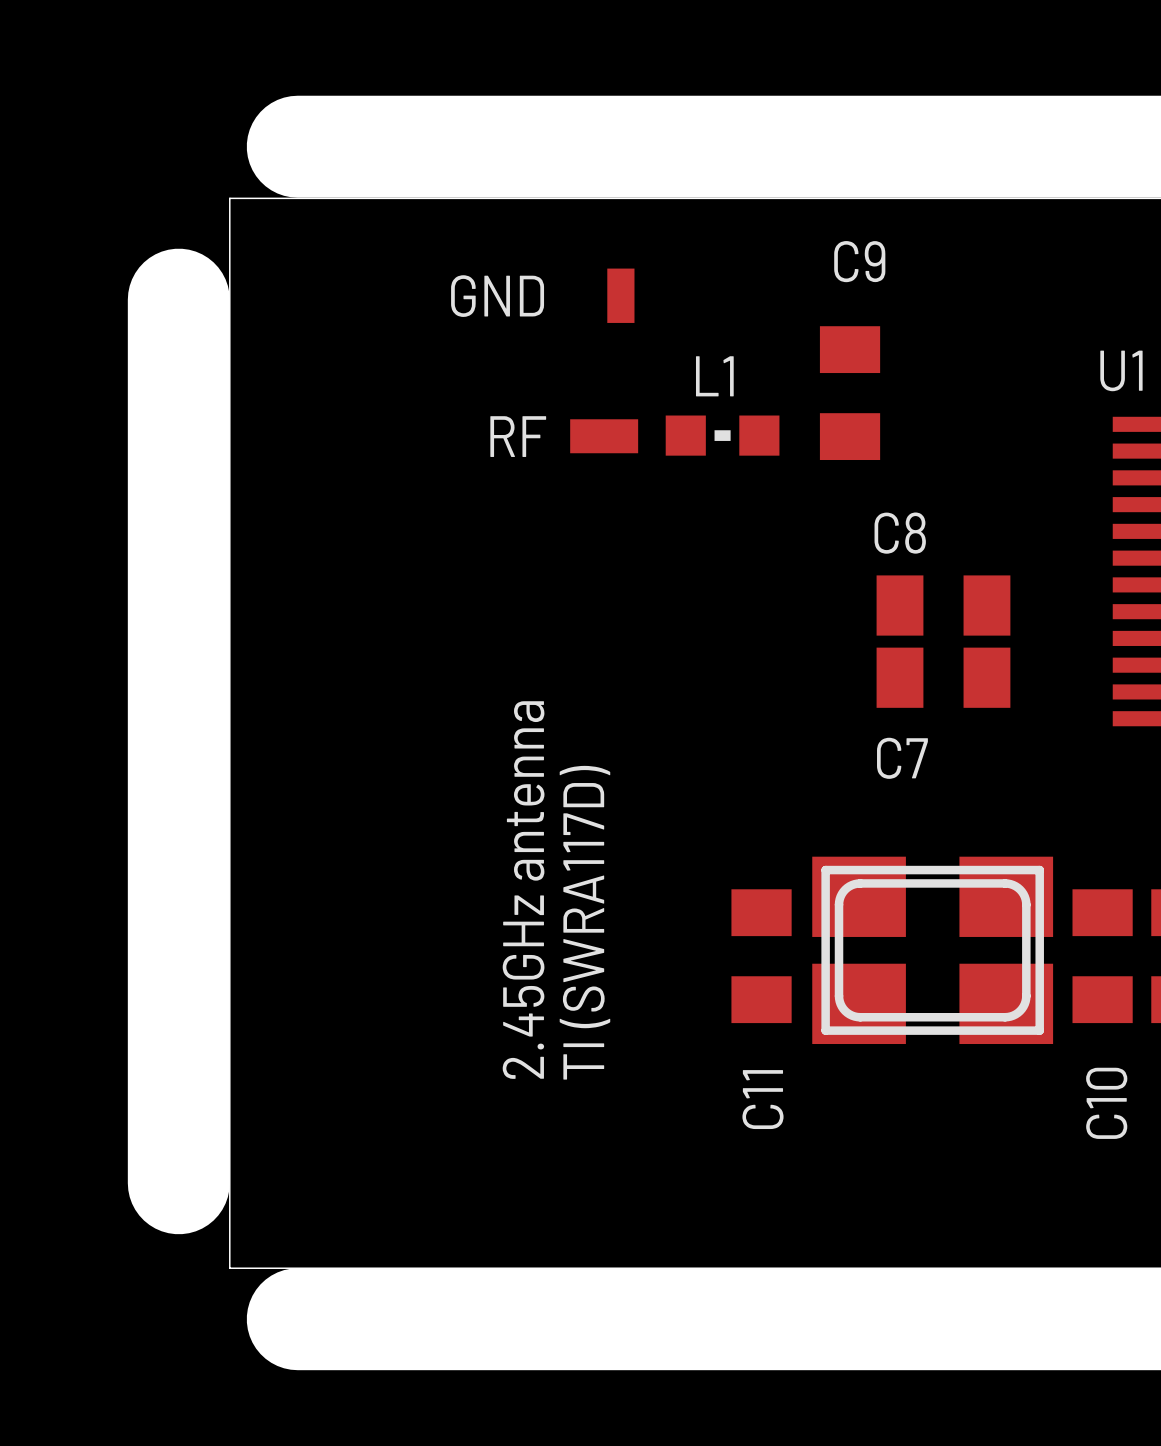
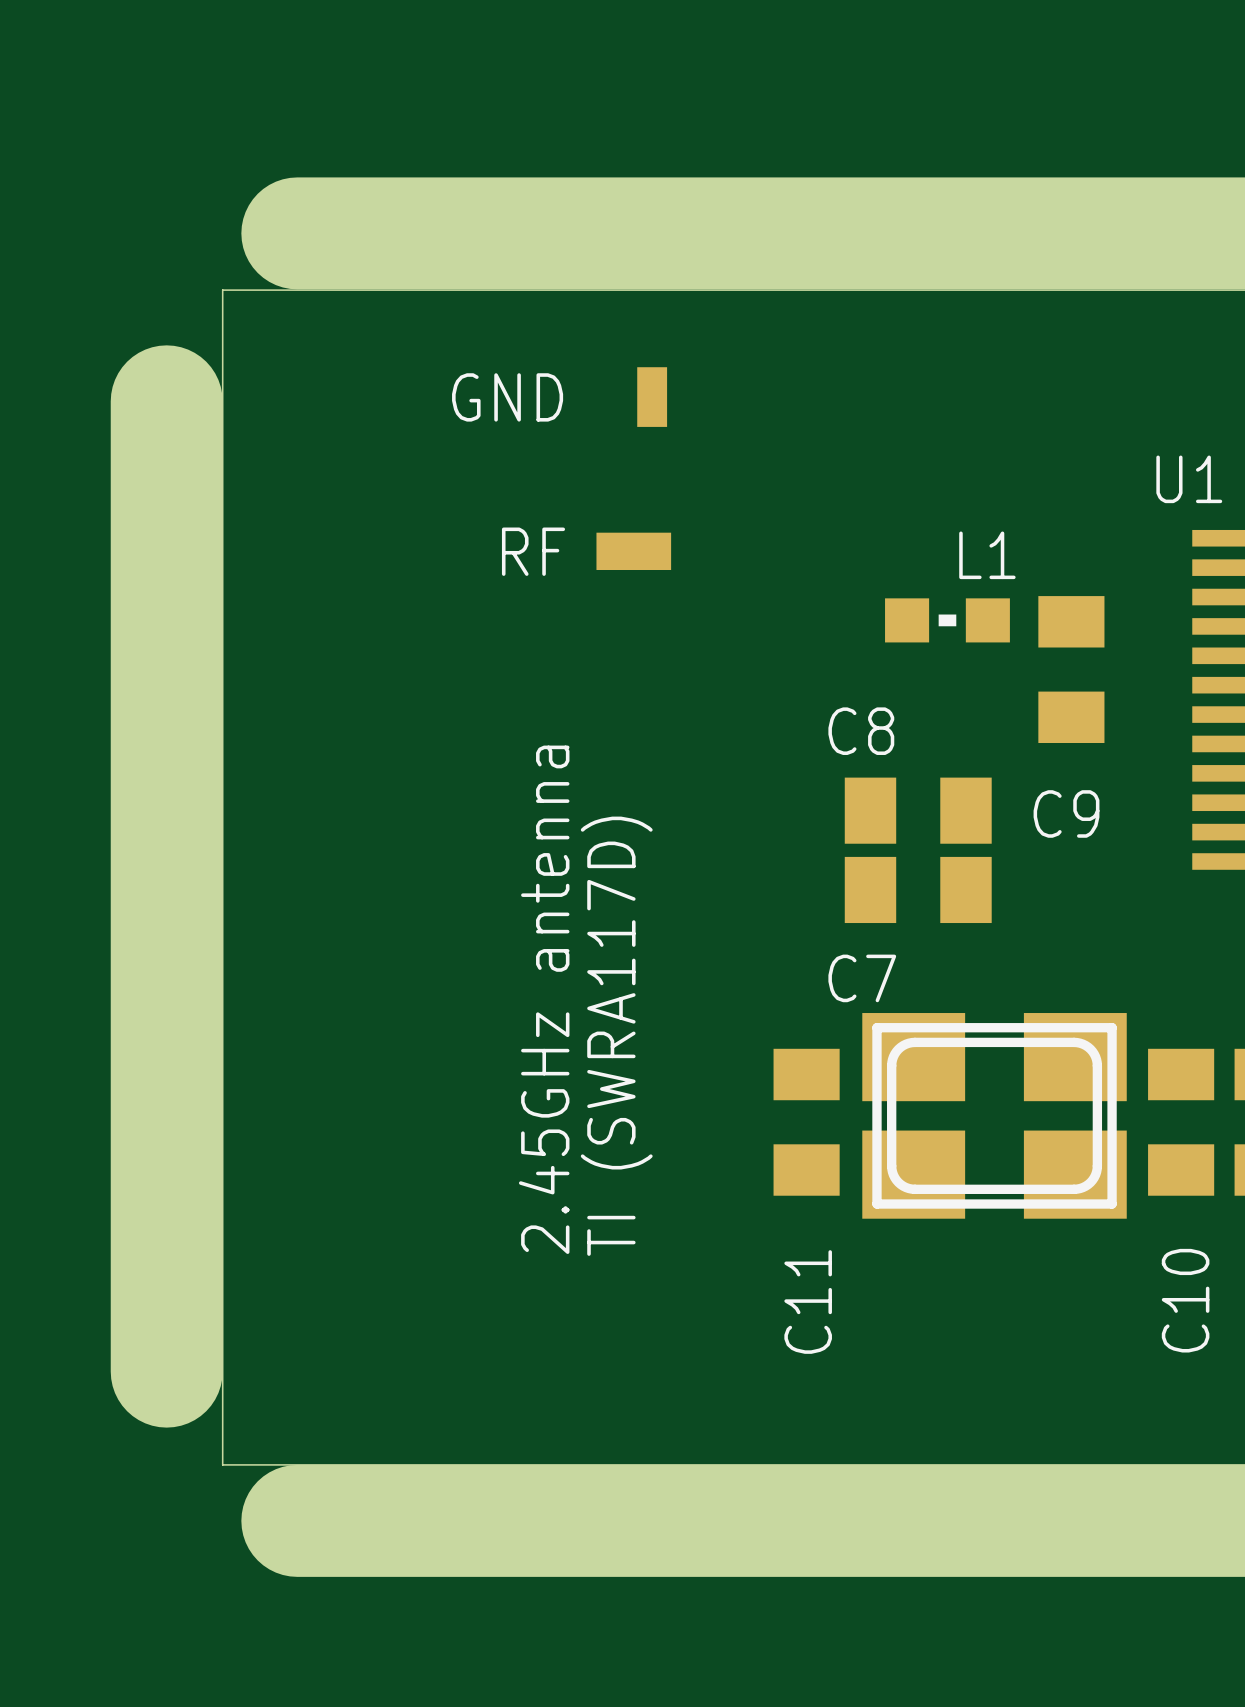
C9 name position: C9 (859, 261) -> C9 (1066, 813)
L1 name position: L1 (714, 376) -> L1 (987, 555)
C9 position: (850, 393) -> (1071, 669)
L1 position: (722, 435) -> (947, 620)
C8 position: (943, 605) -> (918, 810)
C7 position: (943, 677) -> (918, 889)

